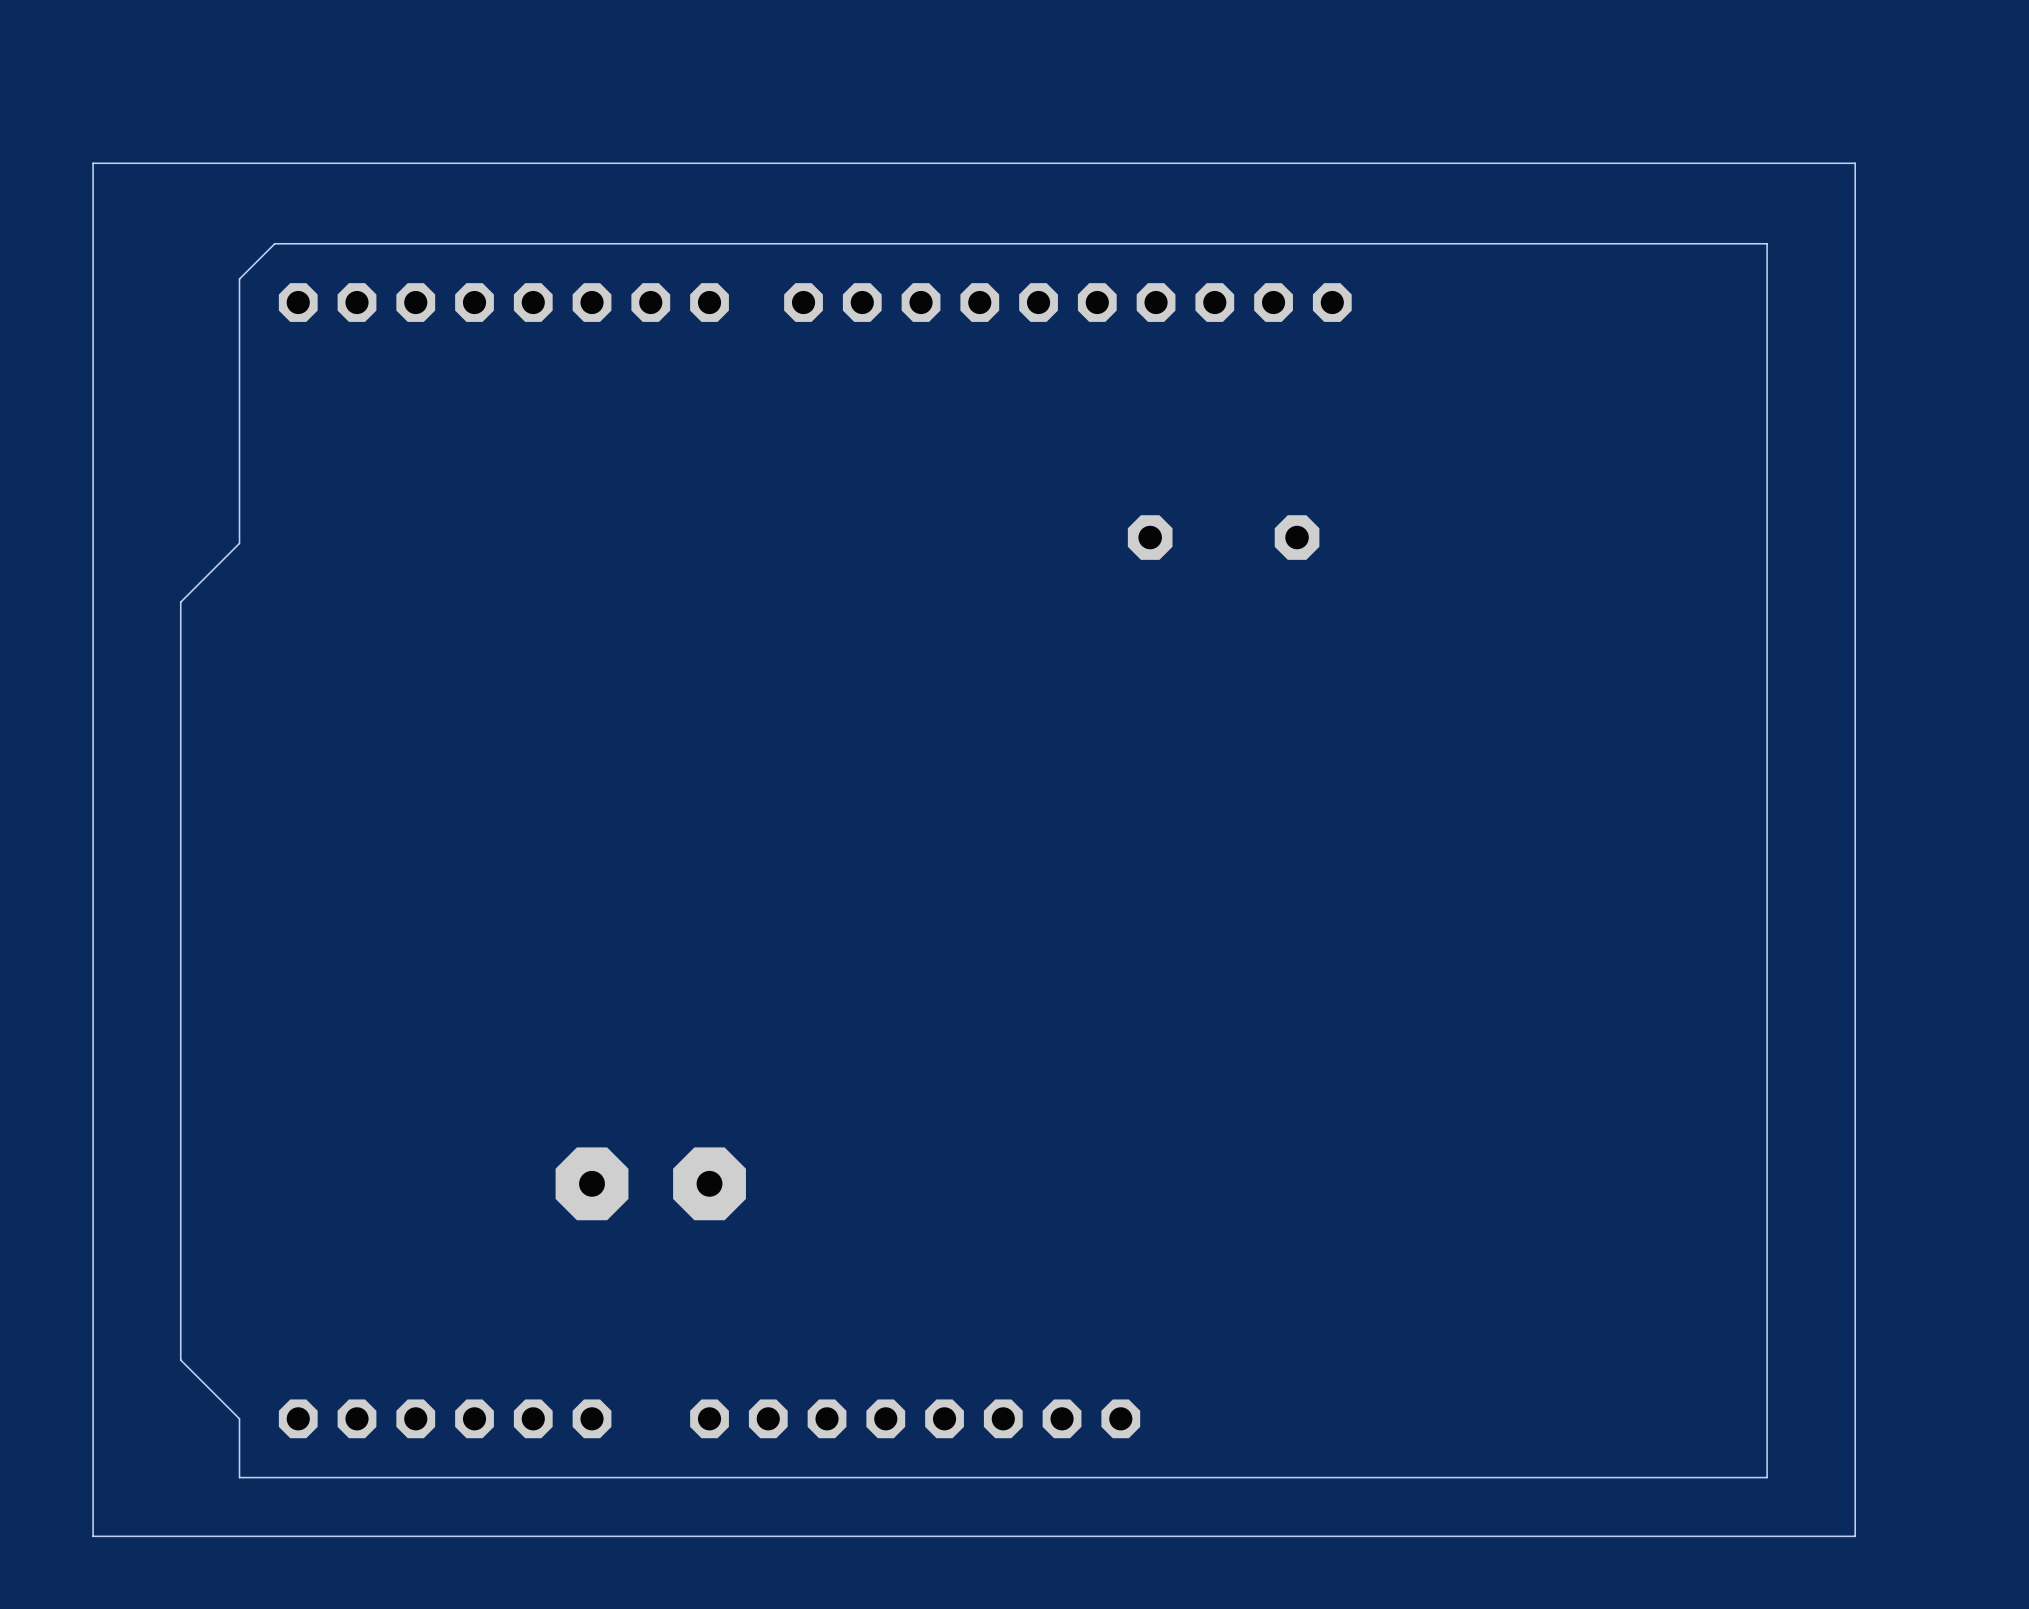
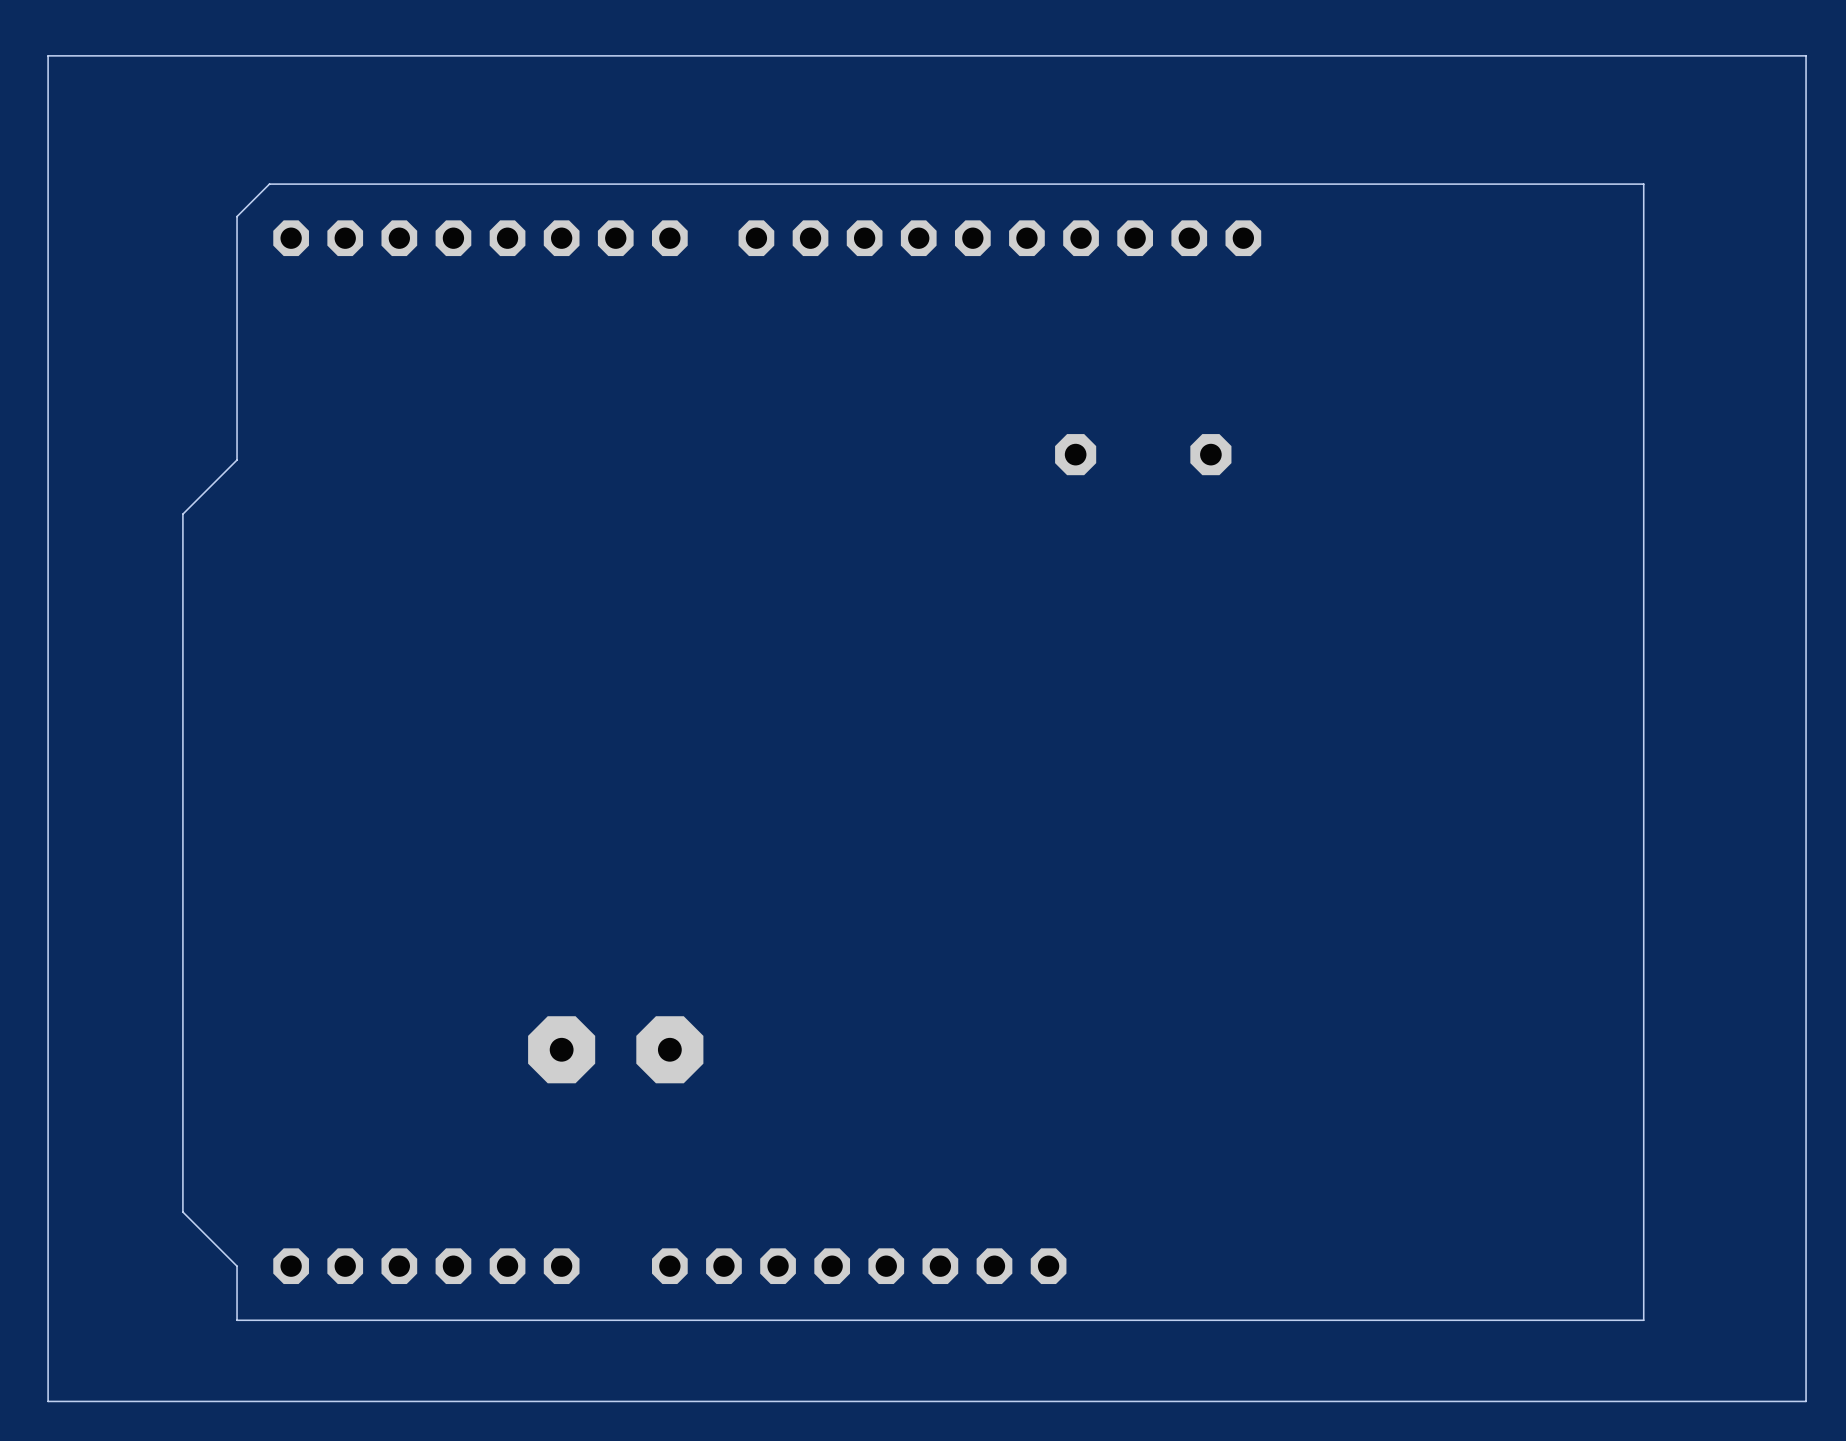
board edge: (1855, 163) (93, 163) (93, 1536) (1855, 1536) (1855, 163) -> (1806, 55) (1806, 1401) (48, 1401) (48, 55) (1806, 55)

